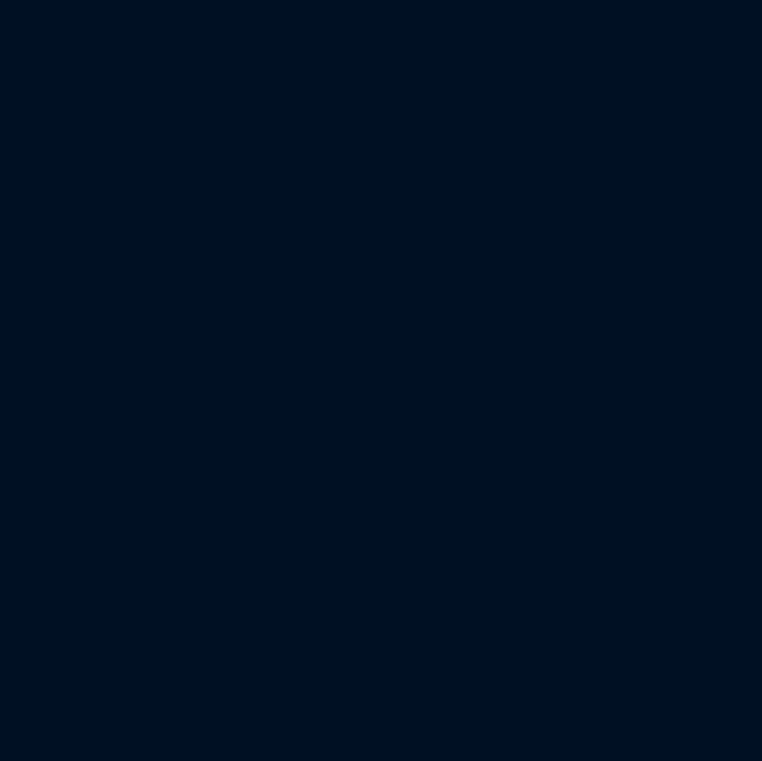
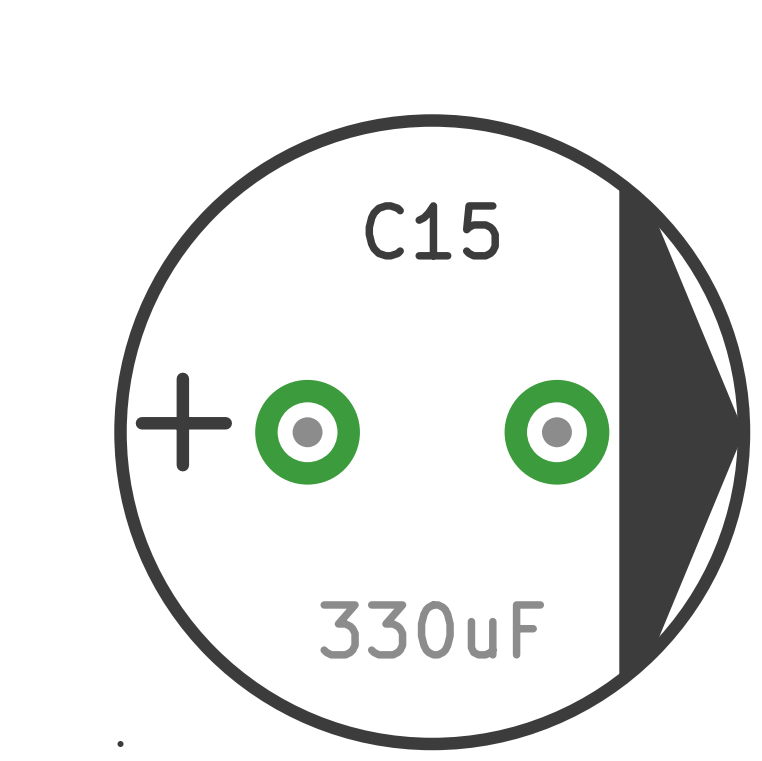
C15: none -> 330uF (432, 432)

